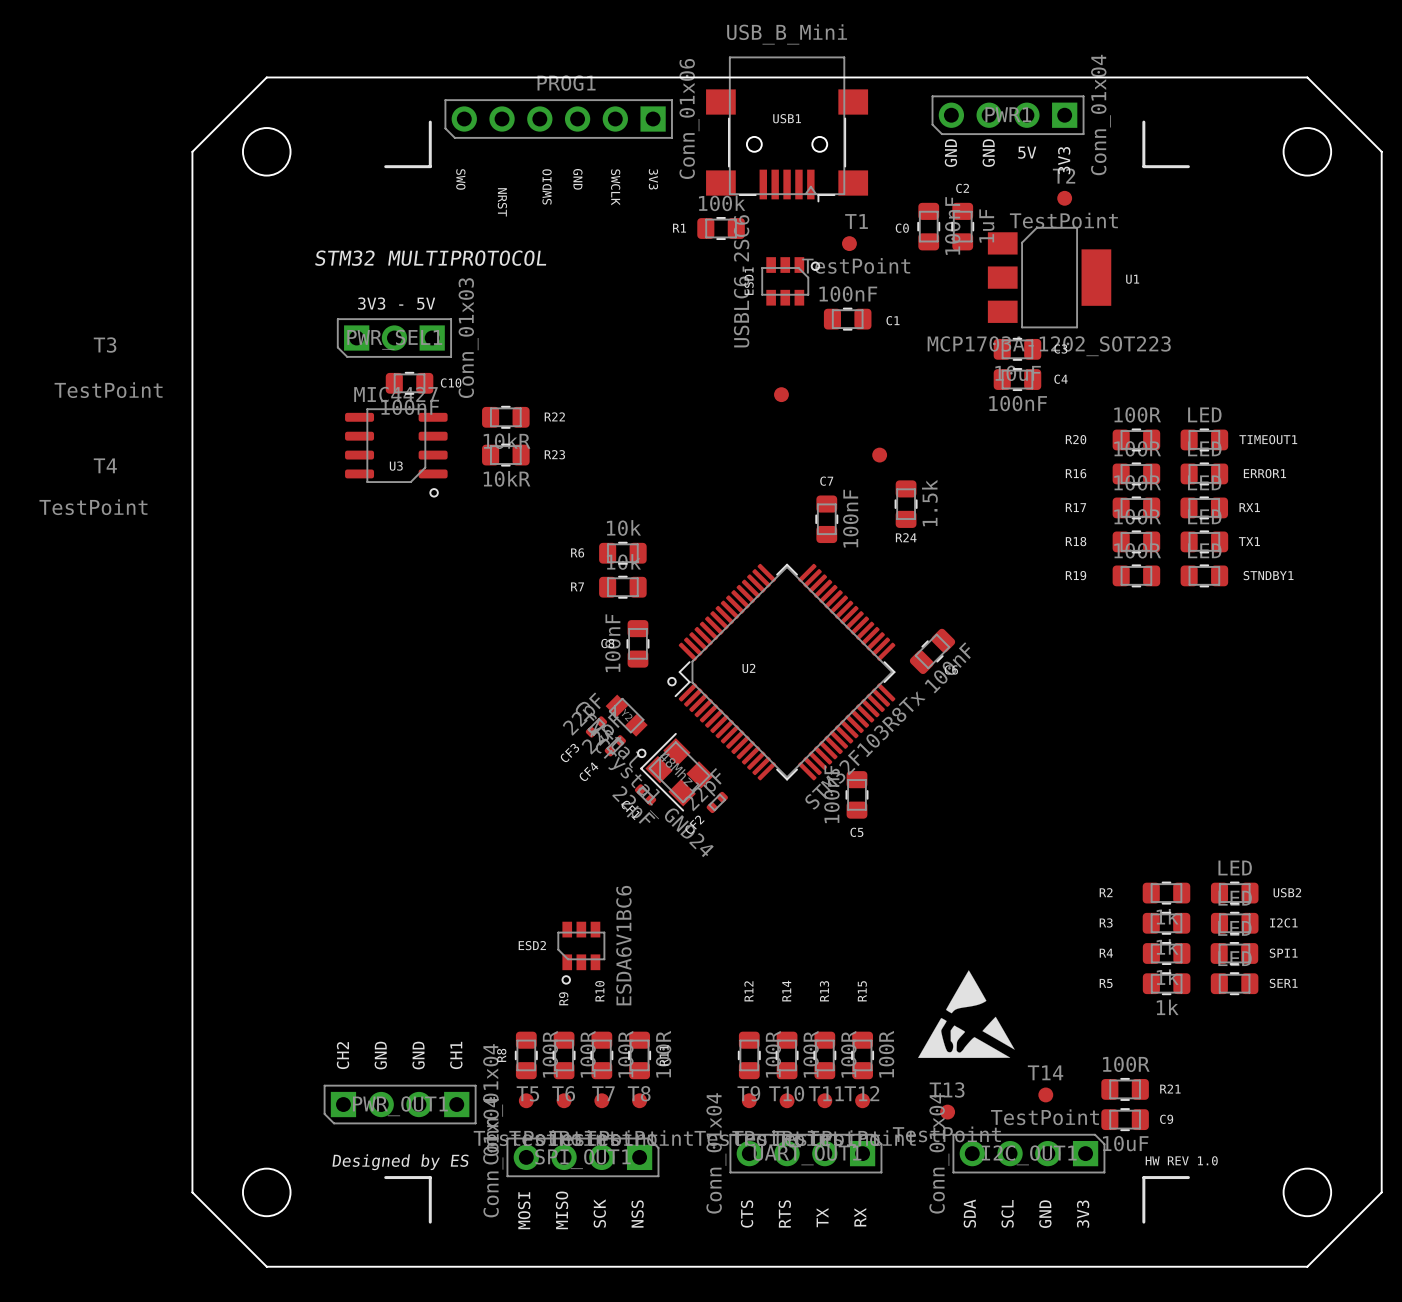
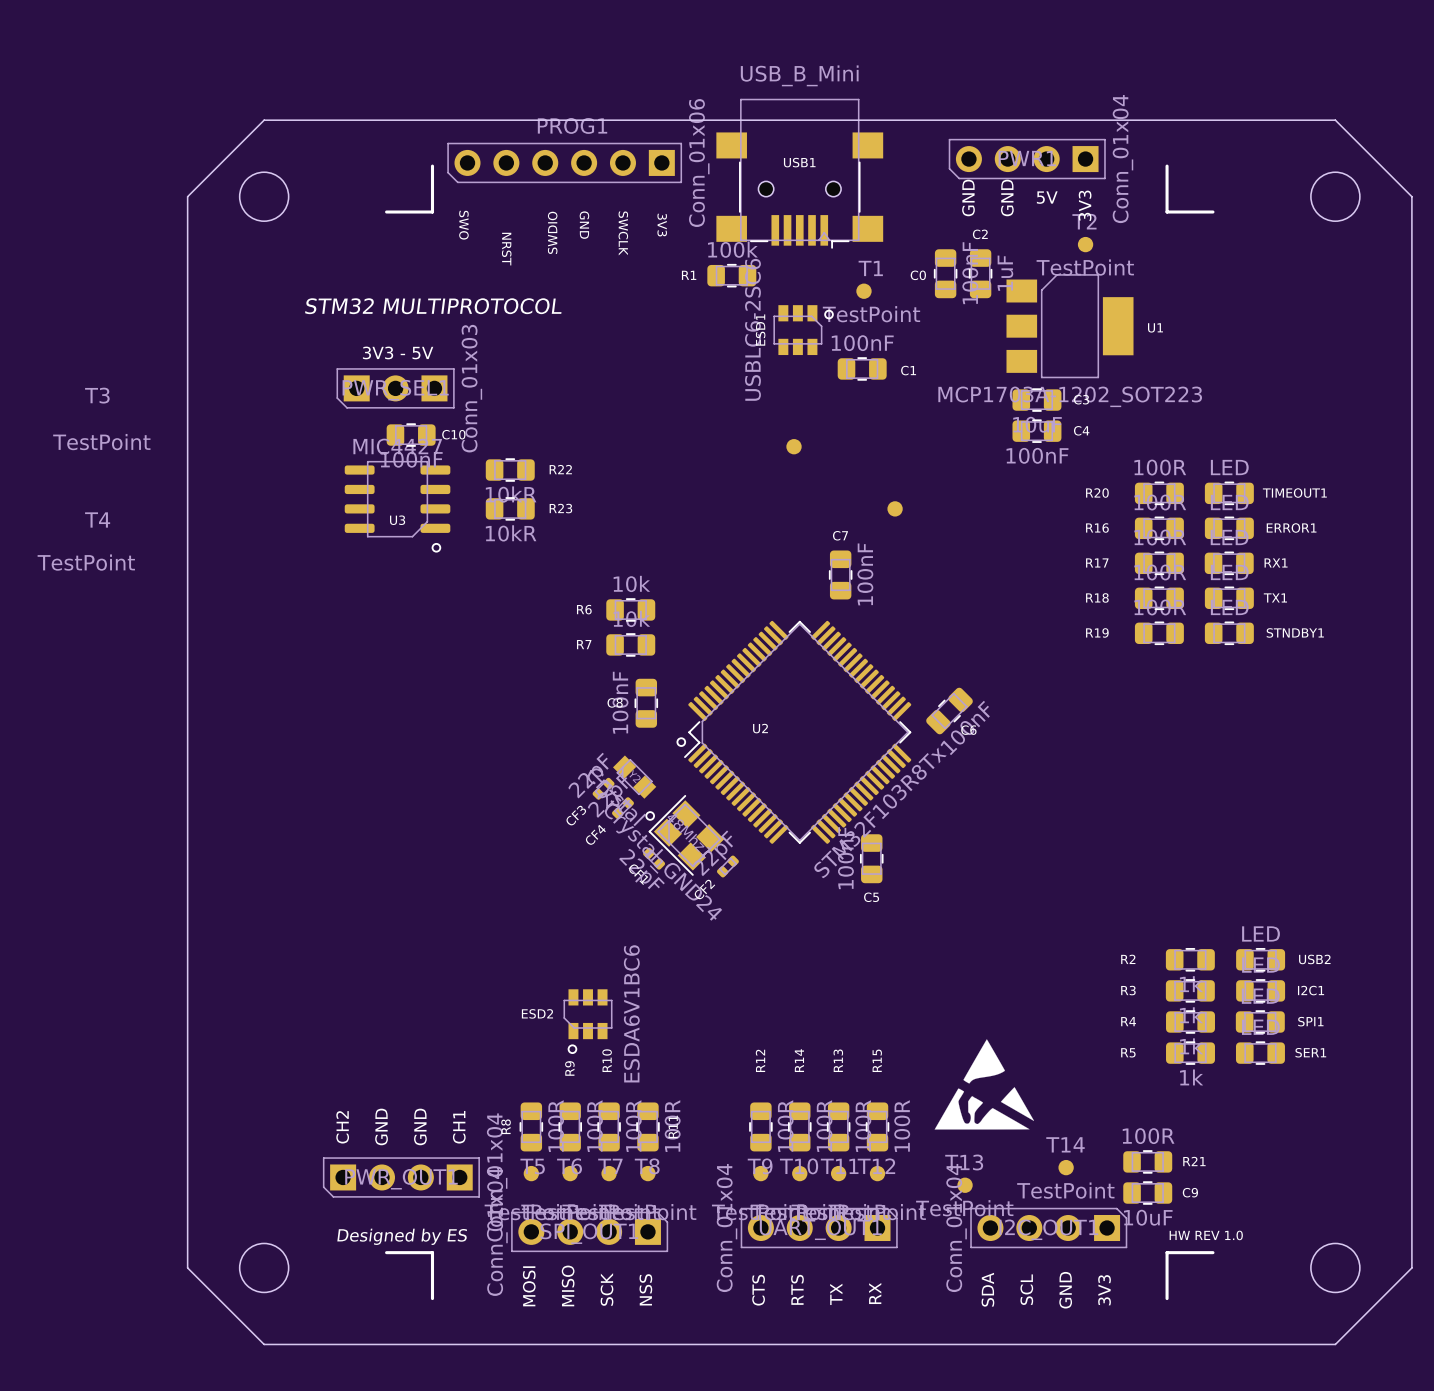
R24: 1.5k (906, 504) -> none

